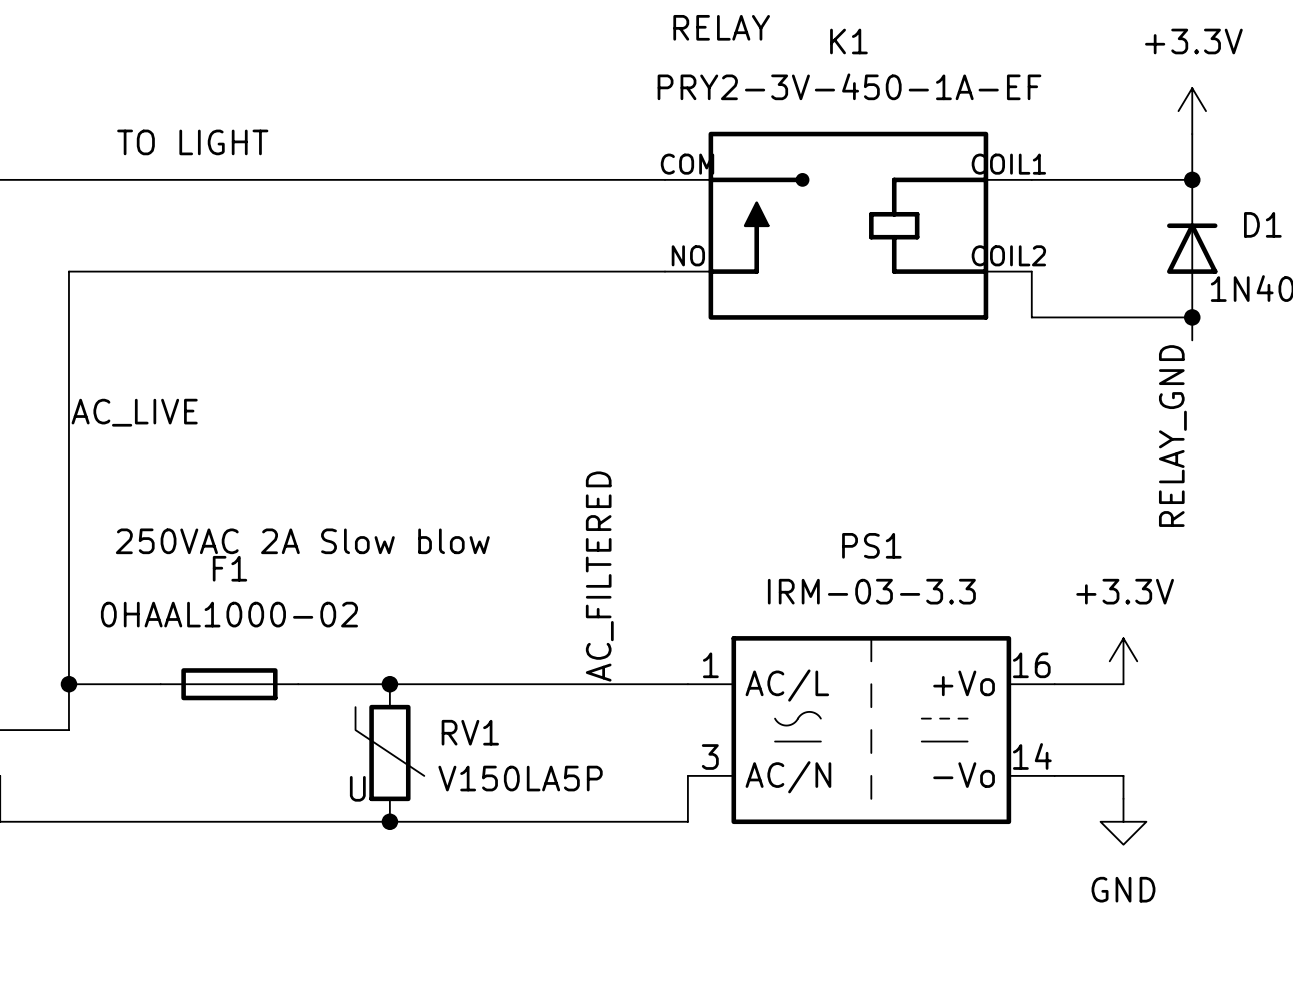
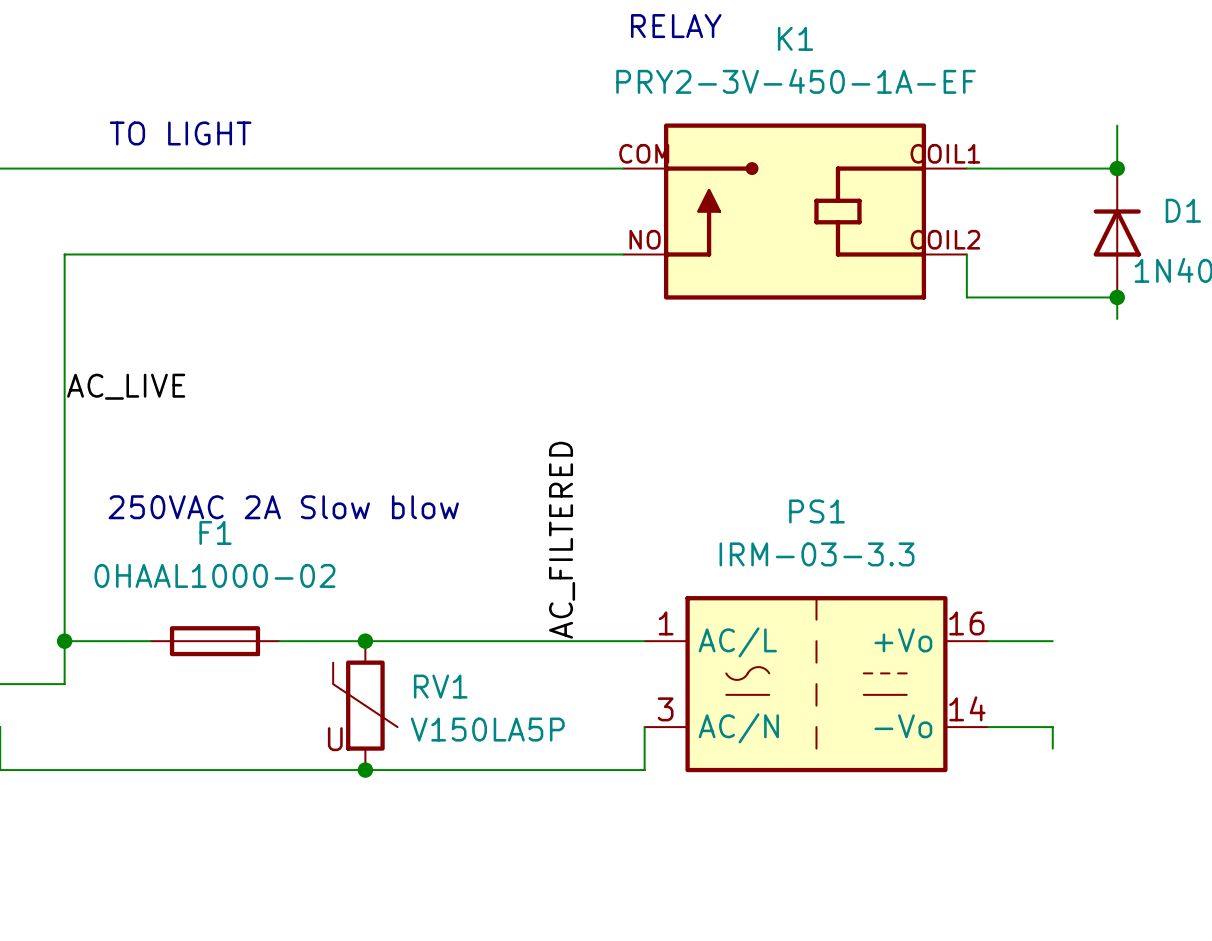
power symbol: +3.3V (1192, 111) -> none
label: RELAY_GND (1172, 436) -> none
power symbol: +3.3V (1123, 661) -> none
power symbol: GND (1123, 821) -> none

